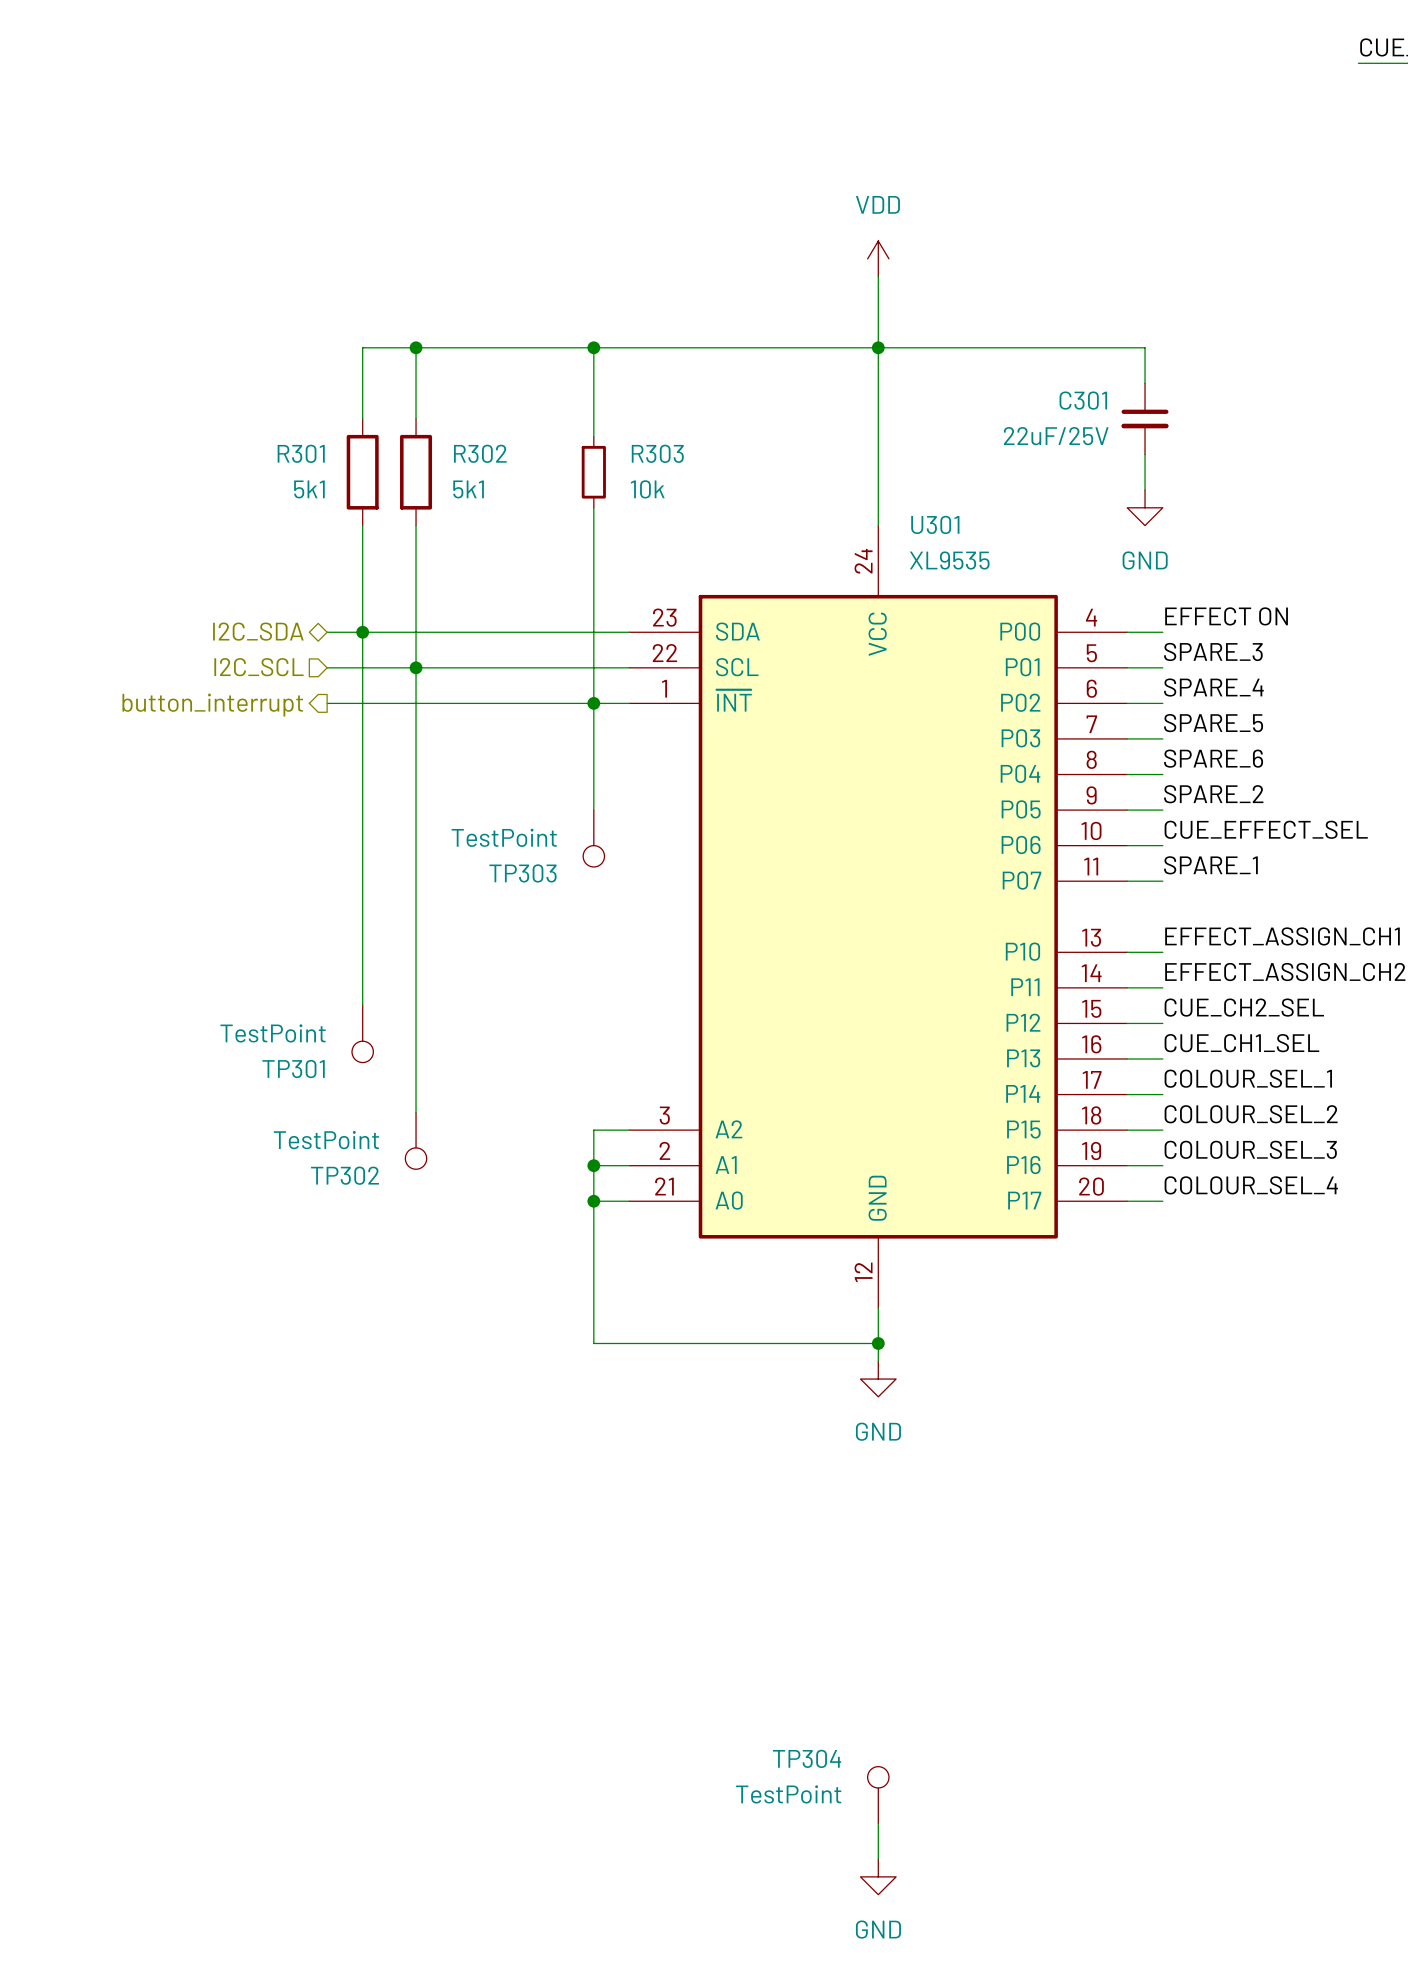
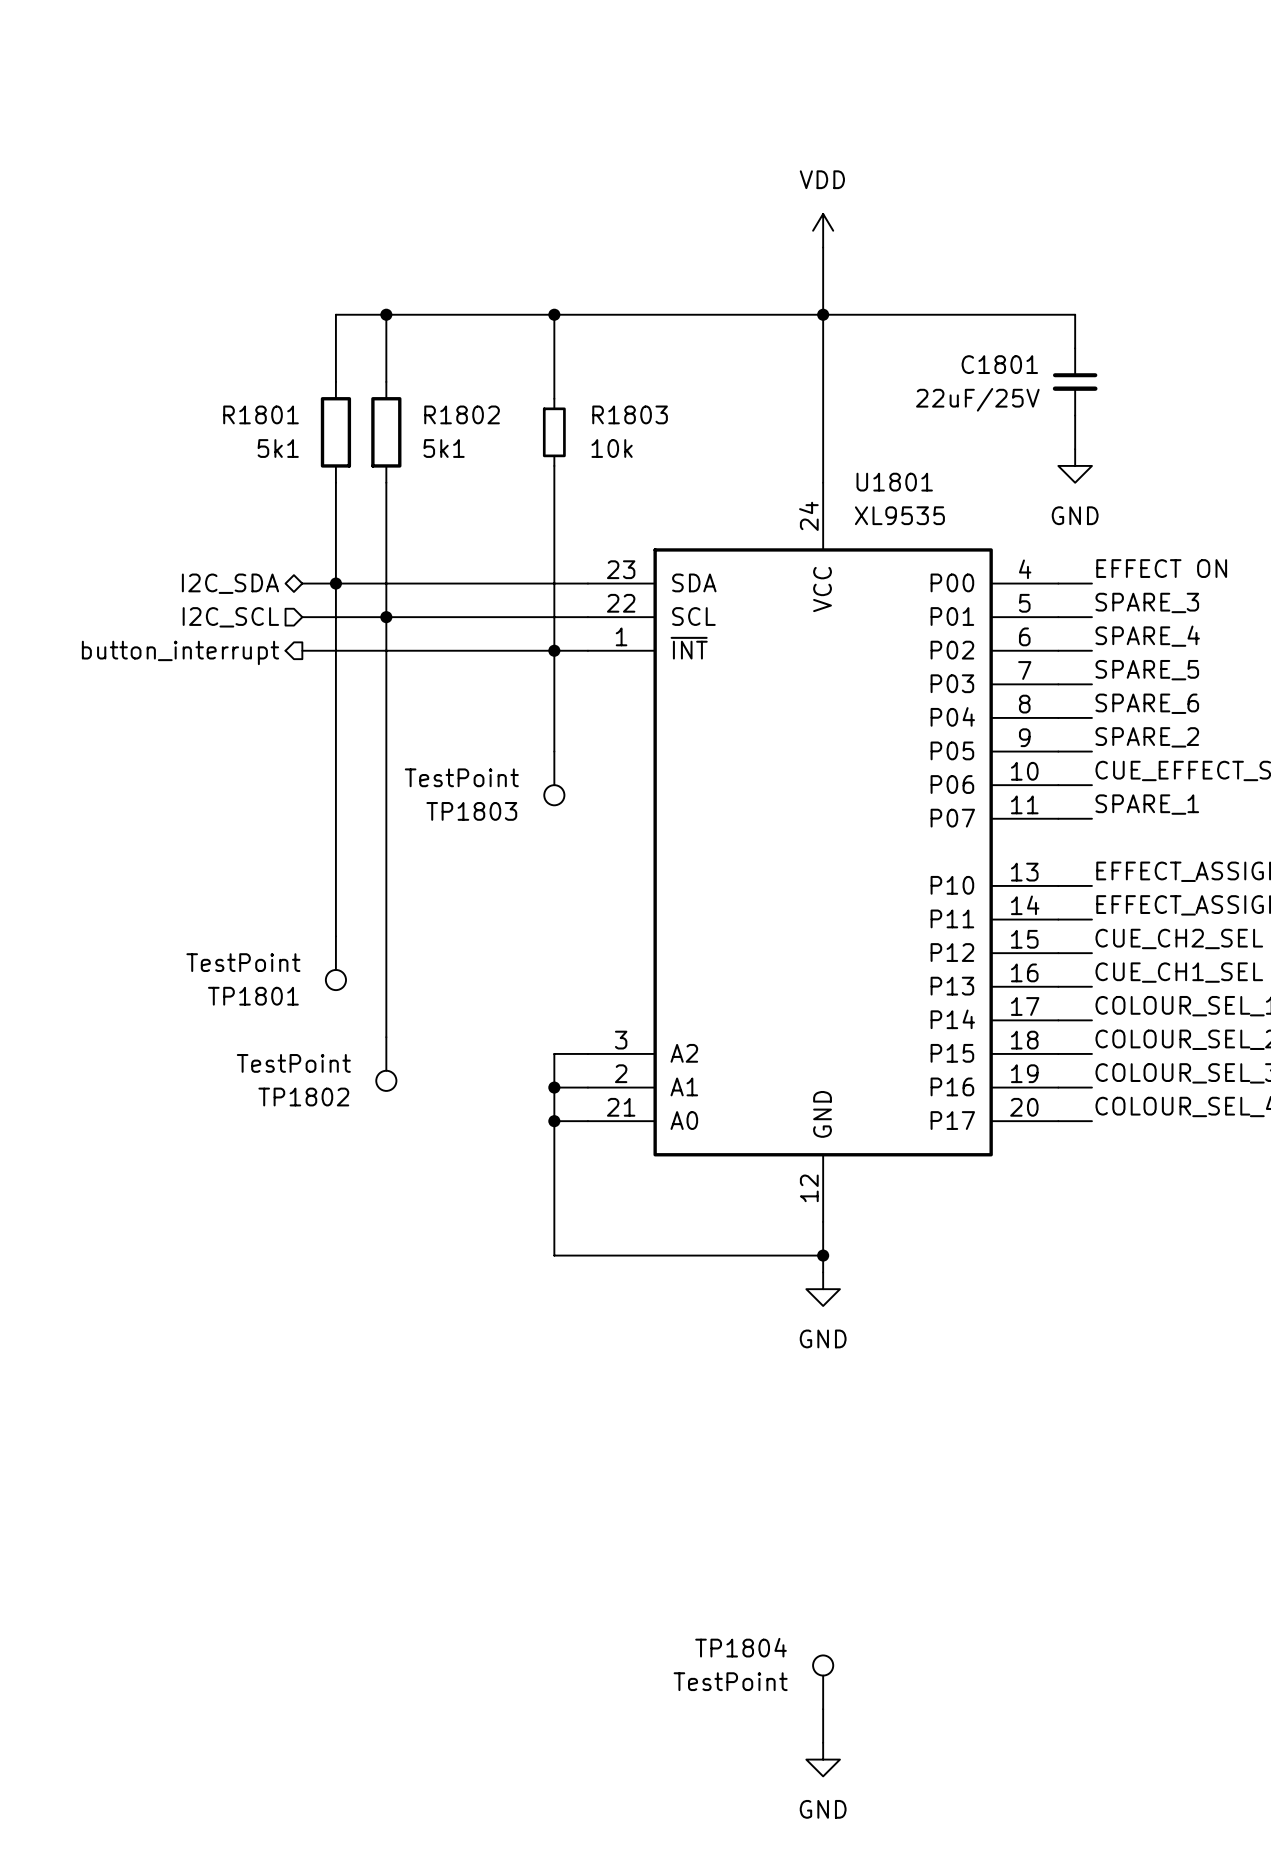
C301 name: C301 (1083, 400) -> C1801 (999, 364)
R301 name: R301 (301, 453) -> R1801 (261, 414)
R302 name: R302 (480, 453) -> R1802 (462, 414)
R303 name: R303 (657, 453) -> R1803 (630, 414)
U301 name: U301 (935, 524) -> U1801 (894, 482)
TP303 name: TP303 (522, 873) -> TP1803 (471, 811)
TP301 name: TP301 (293, 1069) -> TP1801 (253, 996)
TP302 name: TP302 (345, 1175) -> TP1802 (303, 1097)
TP304 name: TP304 (807, 1758) -> TP1804 (741, 1647)

